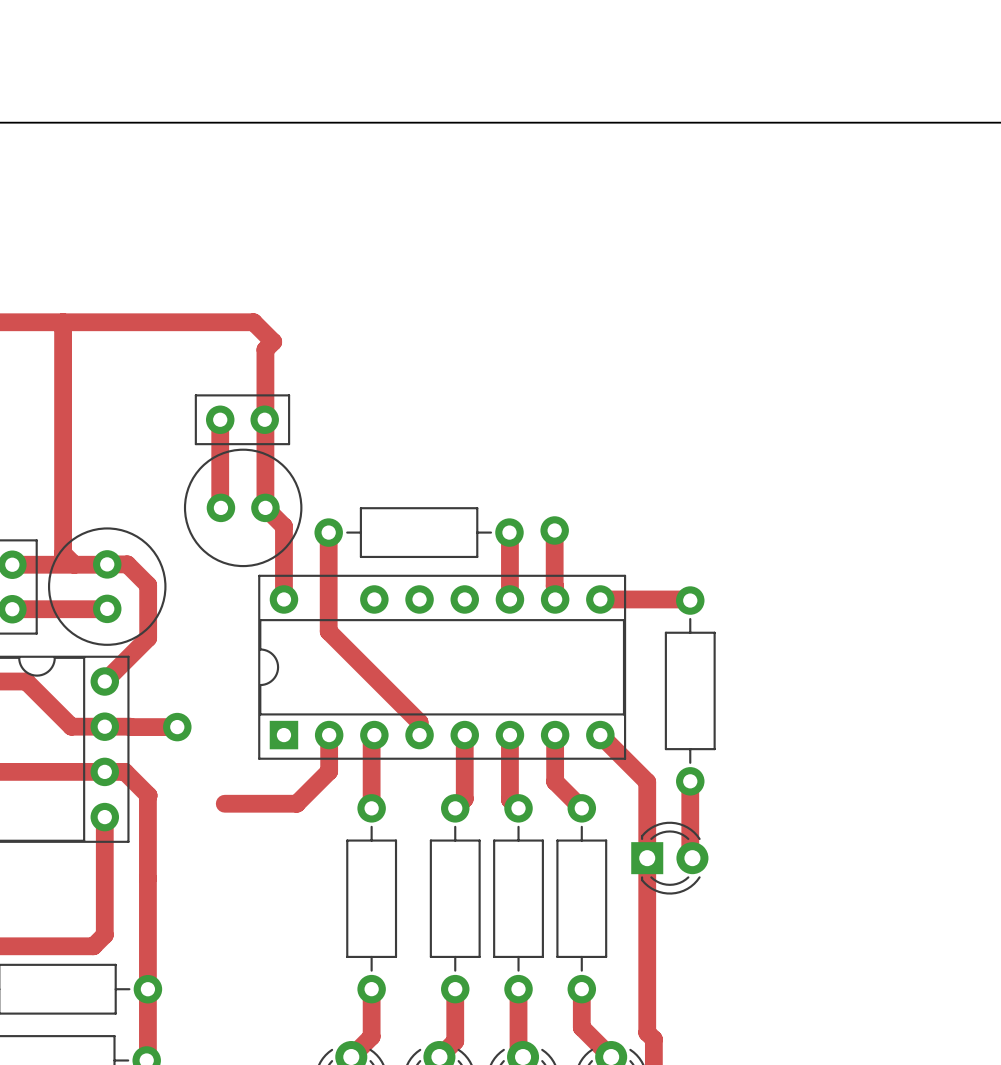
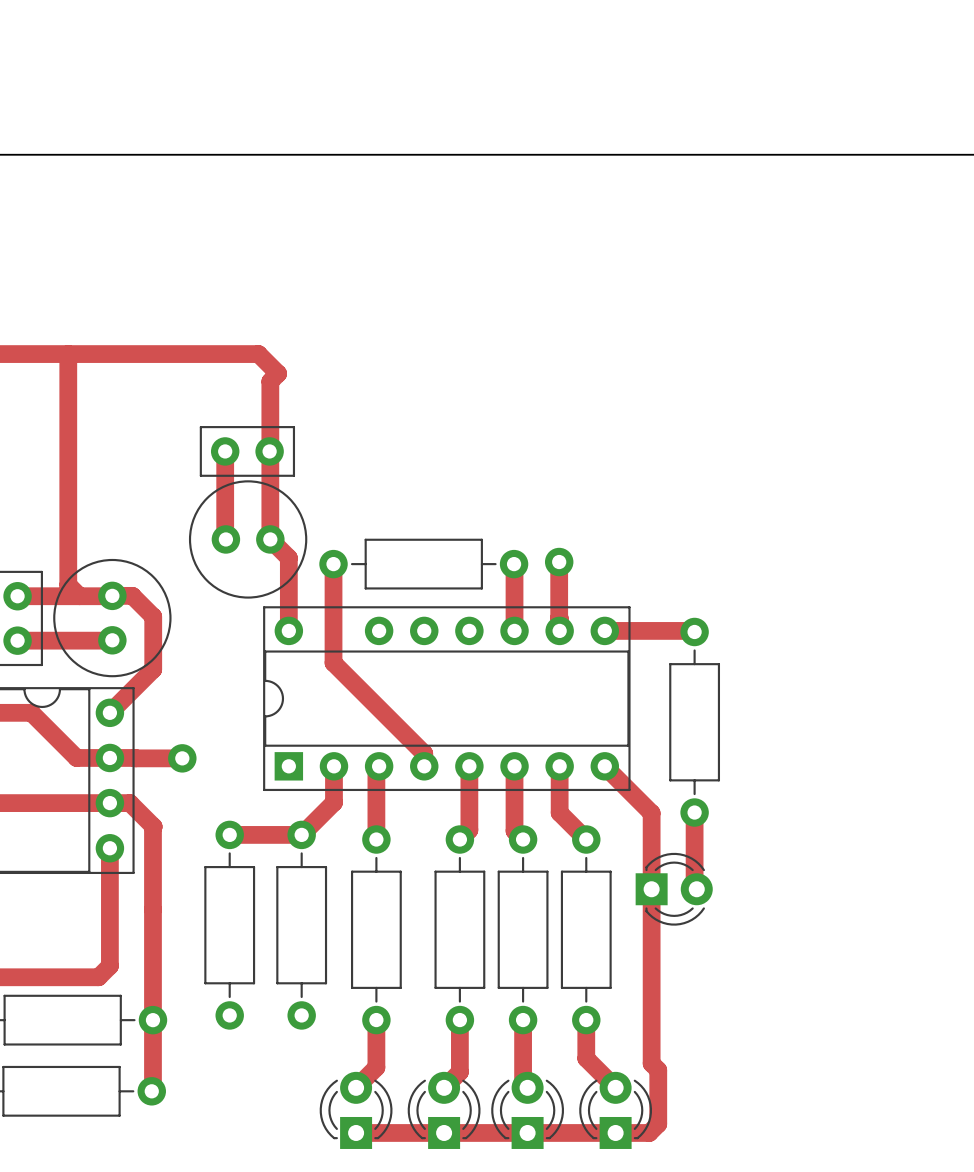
part: none -> (229, 925)
part: none -> (301, 925)

